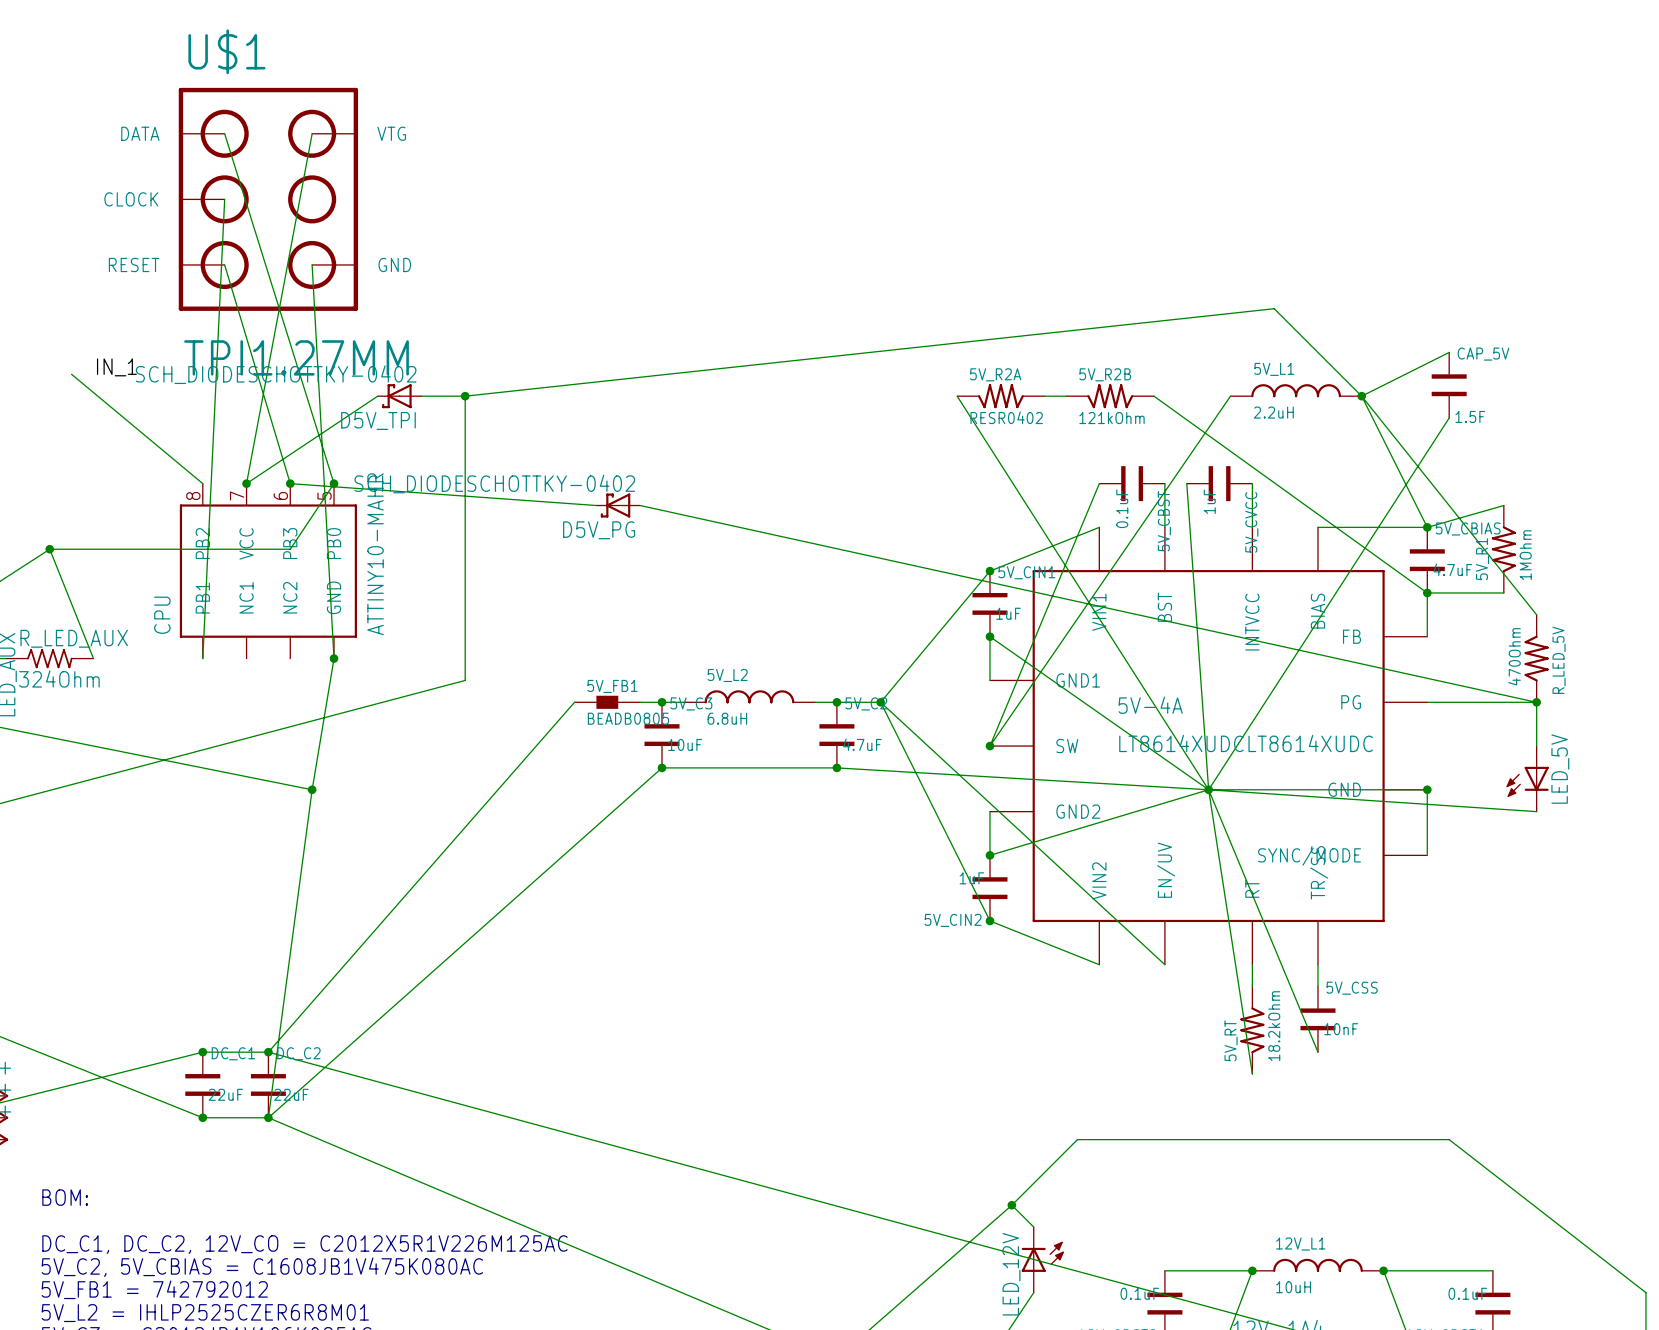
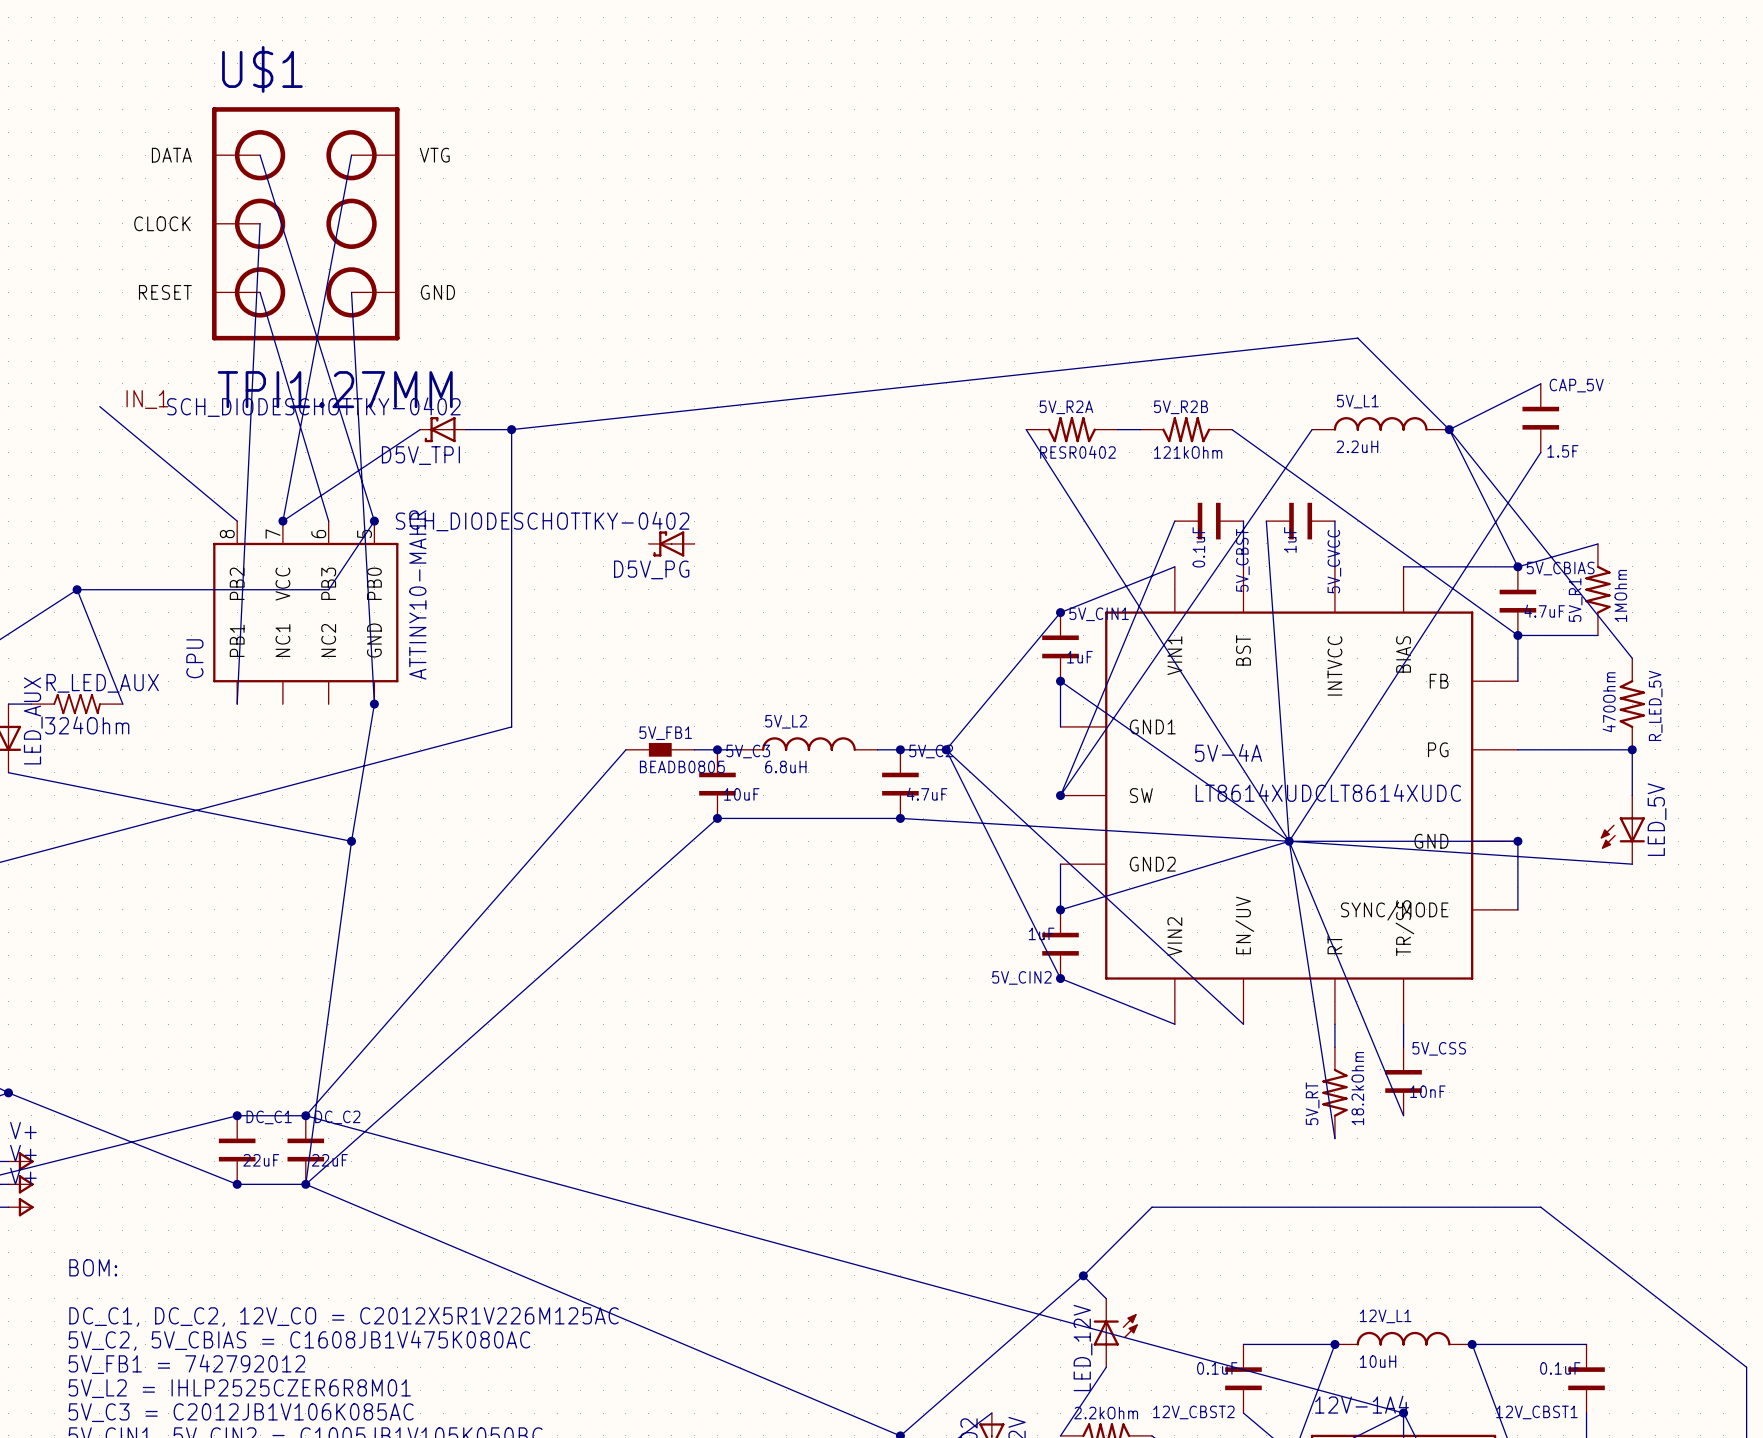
wire: (290, 483) (596, 505) -> none
junction: (290, 483) -> none
wire: (640, 505) (1536, 702) -> none

